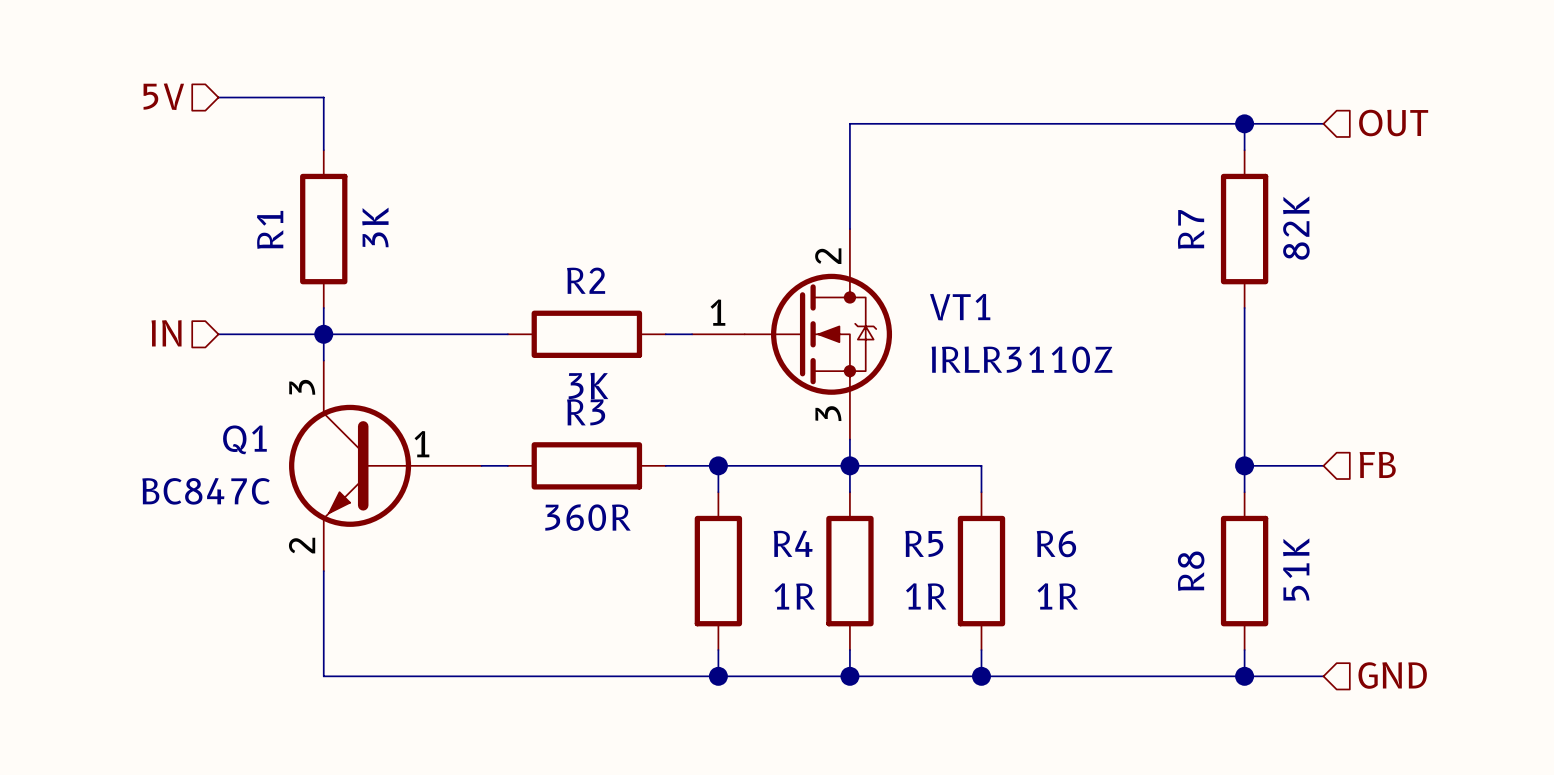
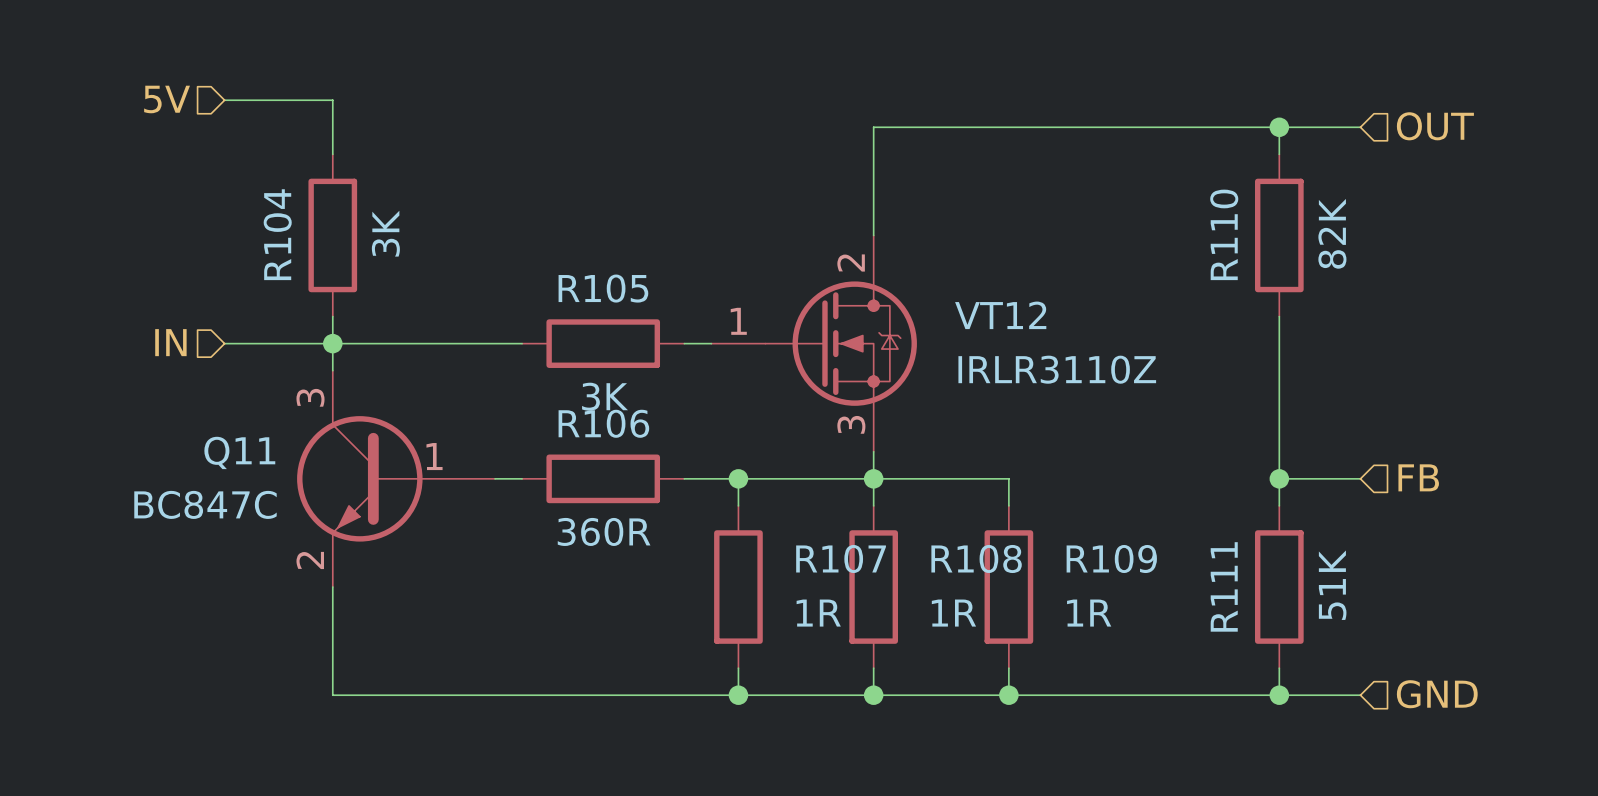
R1 name: R1 (270, 229) -> R104 (277, 234)
R7 name: R7 (1191, 229) -> R110 (1224, 234)
R2 name: R2 (586, 280) -> R105 (603, 288)
VT1 name: VT1 (960, 307) -> VT12 (1000, 315)
R3 name: R3 (586, 412) -> R106 (603, 423)
Q1 name: Q1 (244, 439) -> Q11 (239, 452)
R4 name: R4 (793, 543) -> R107 (841, 558)
R5 name: R5 (924, 543) -> R108 (976, 558)
R6 name: R6 (1056, 543) -> R109 (1111, 558)
R8 name: R8 (1191, 571) -> R111 (1224, 586)

